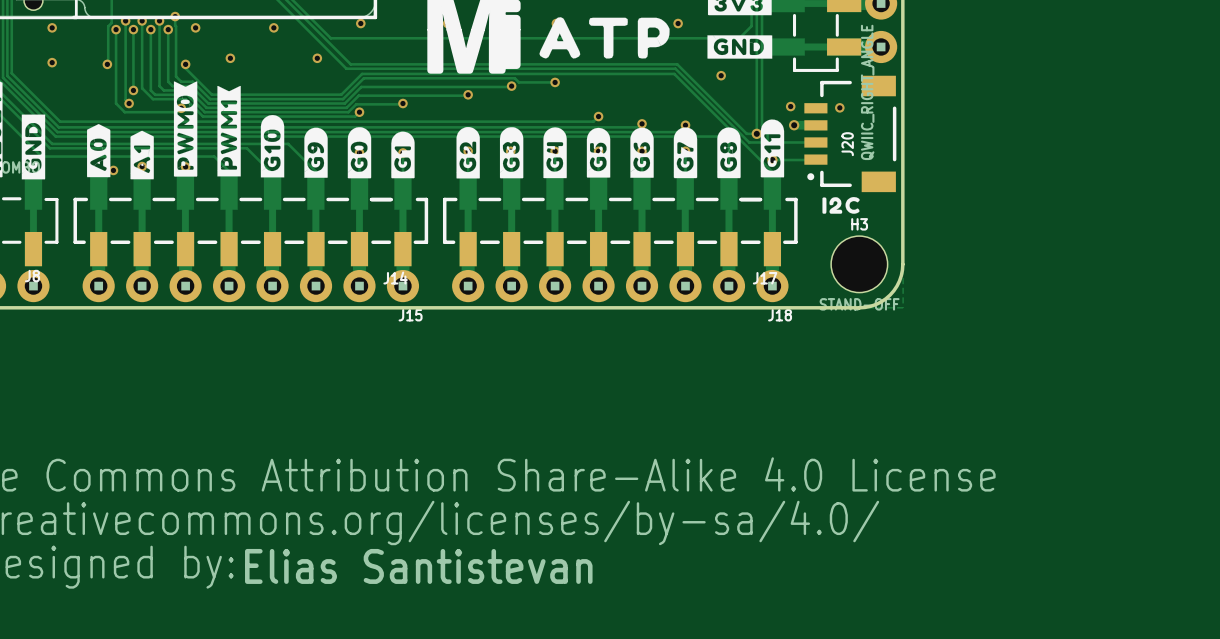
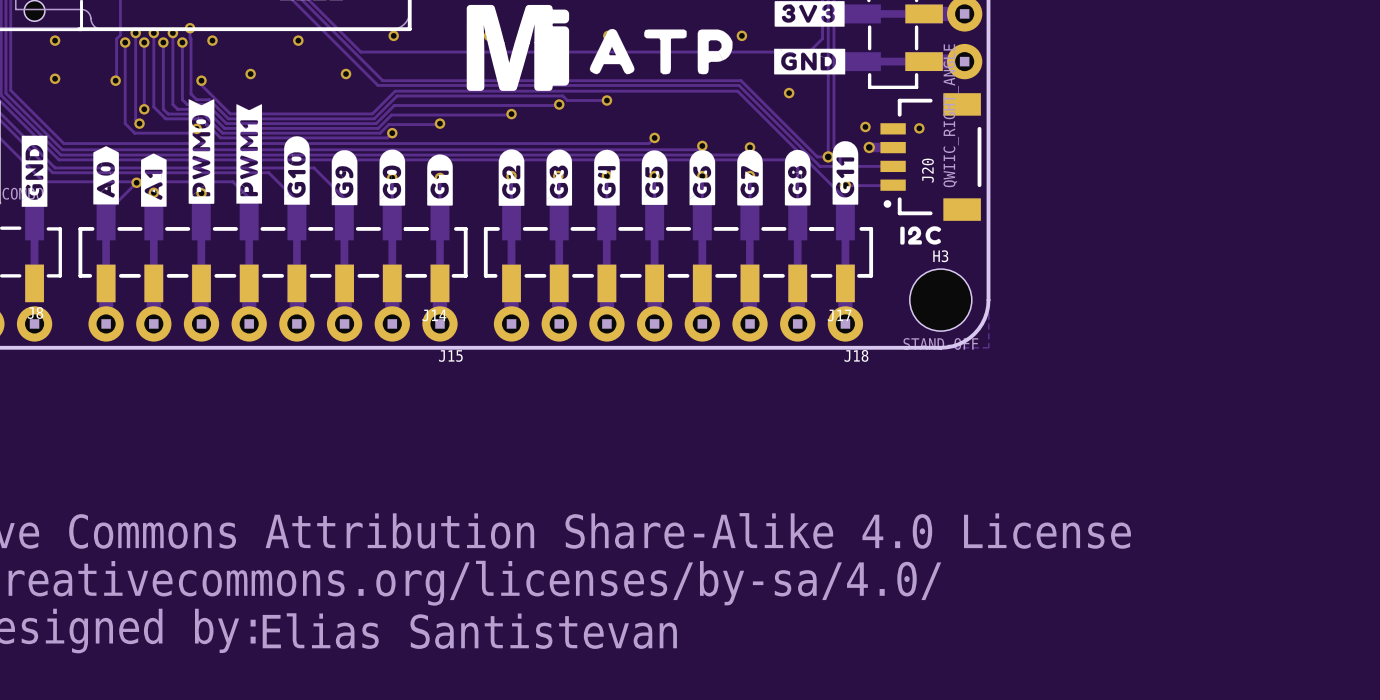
track: none -> (136, 182) (122, 197)
via position: (113, 170) -> (136, 182)

